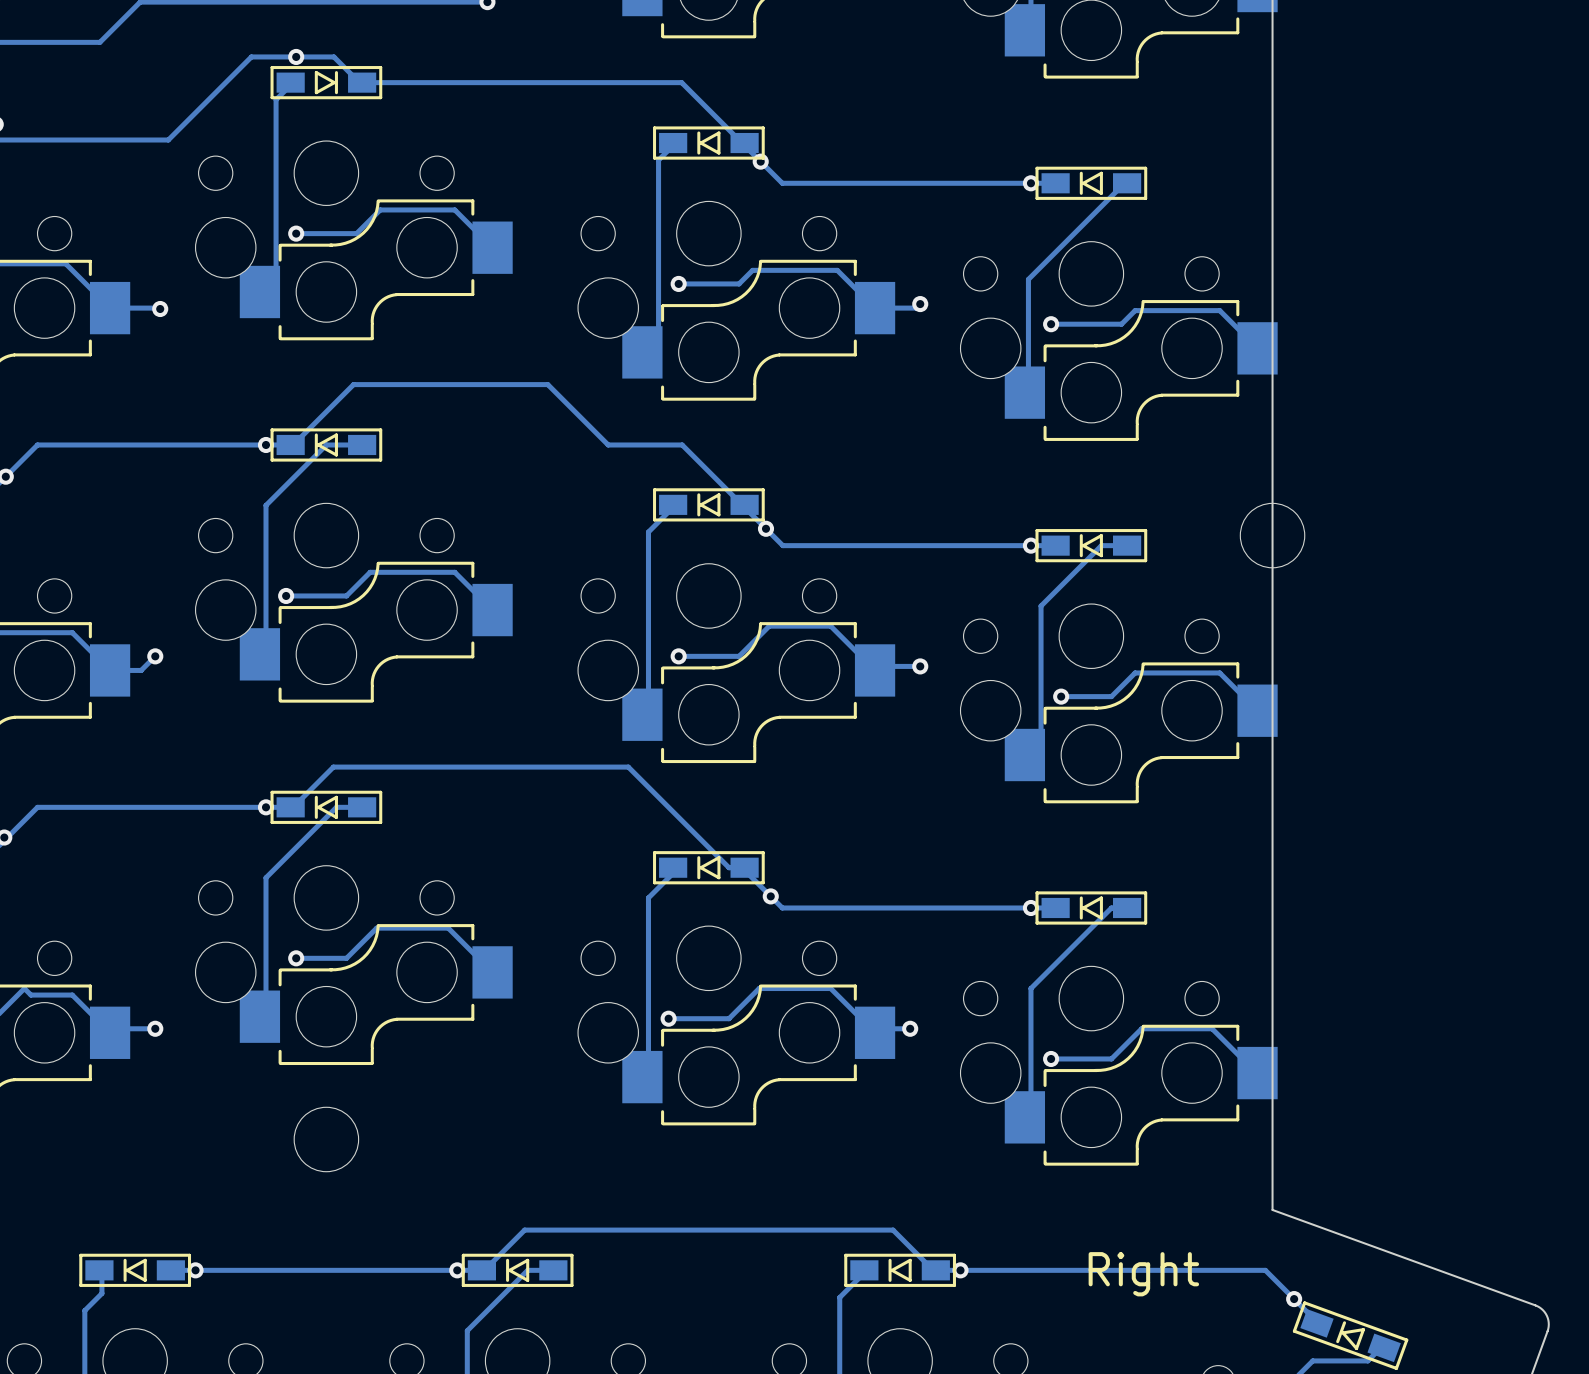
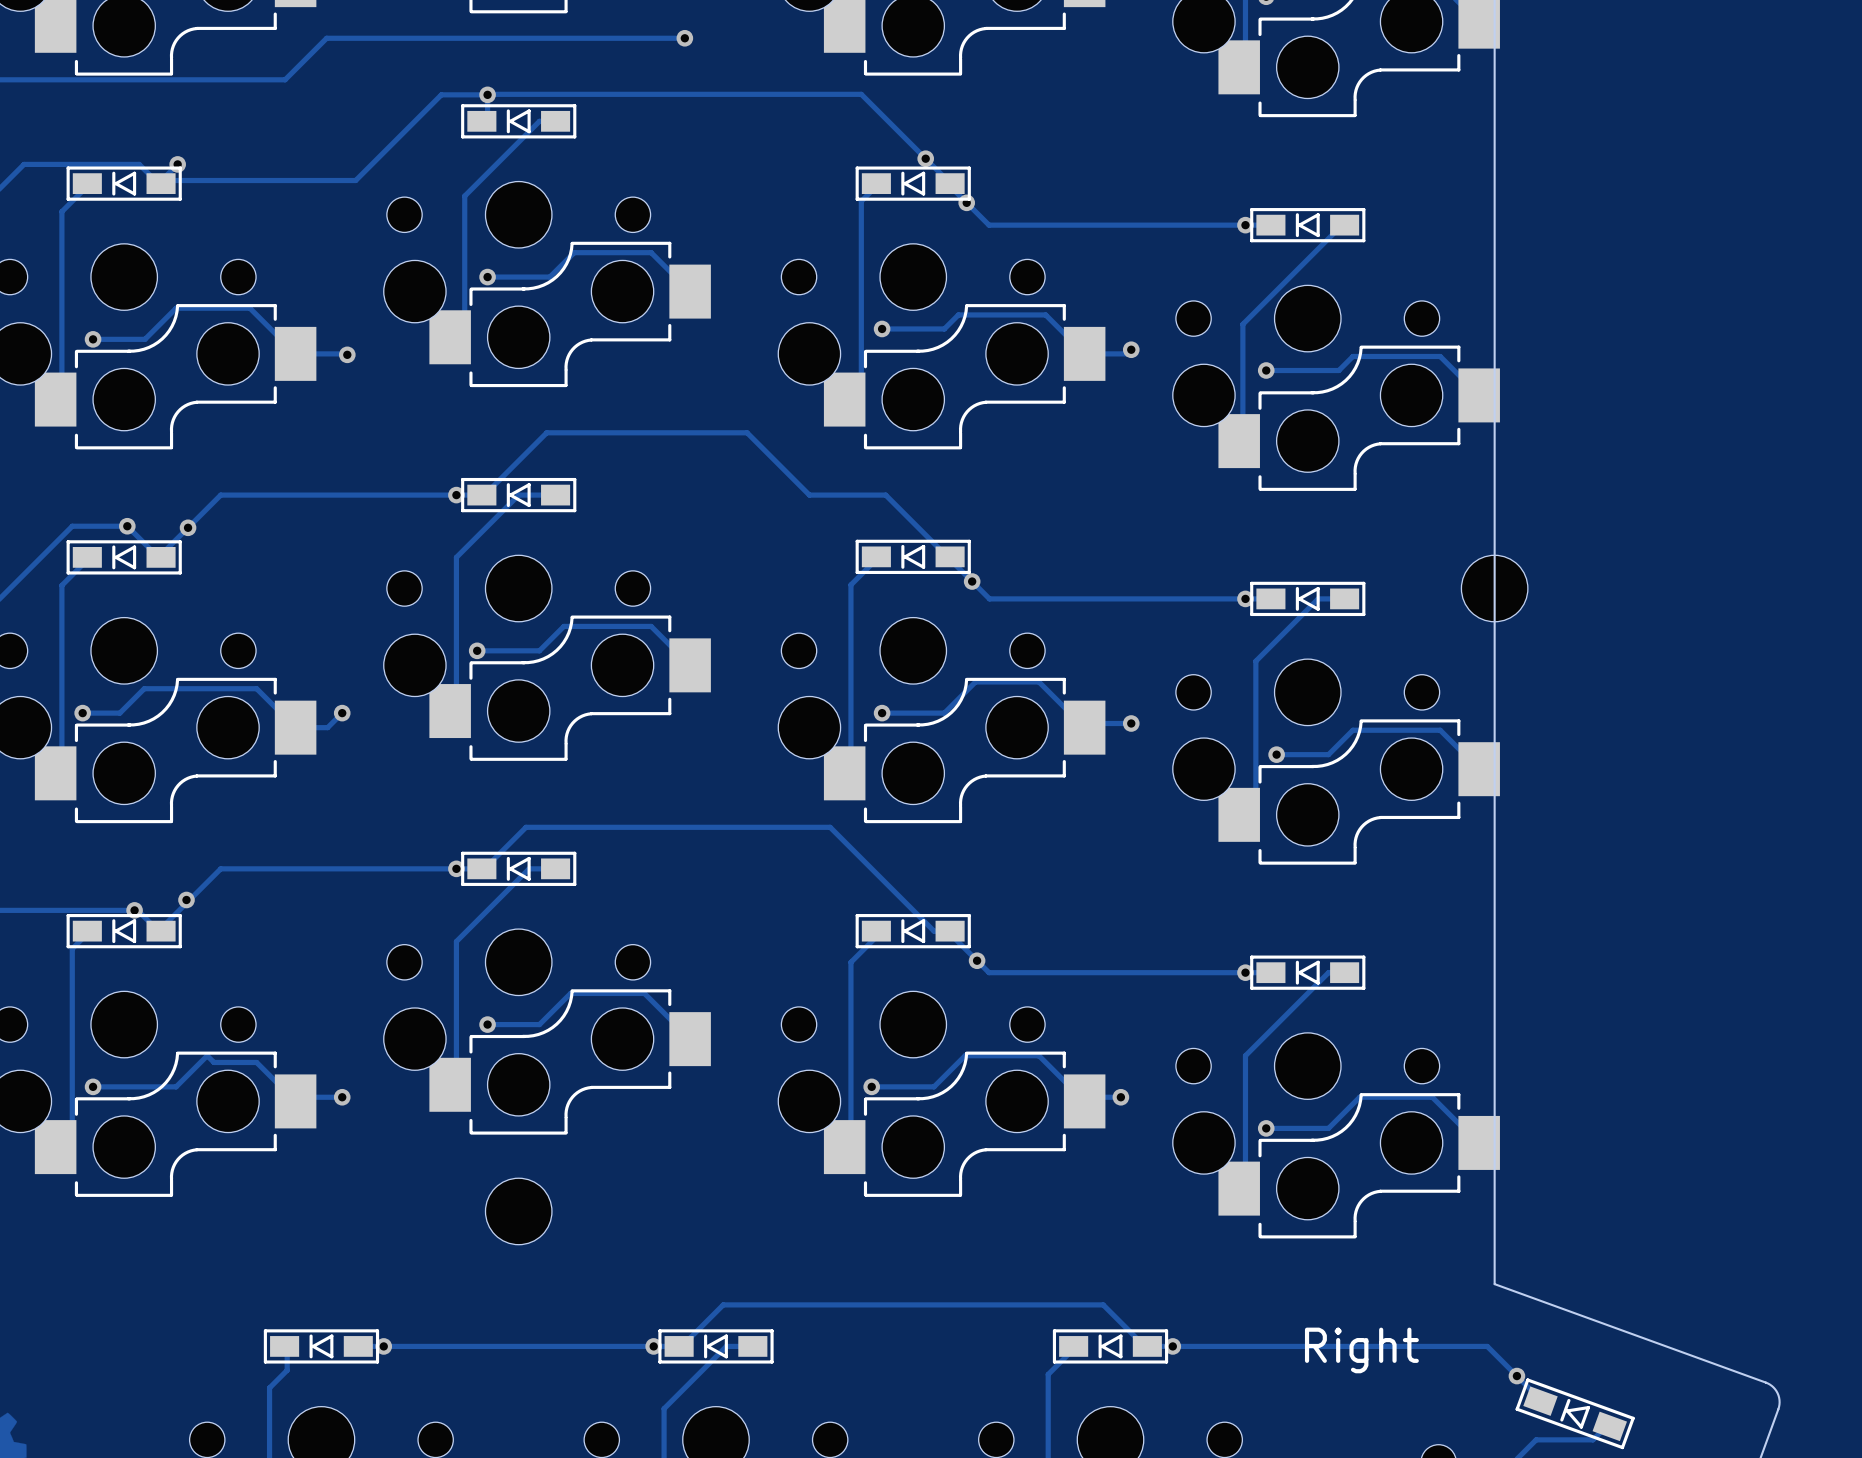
track: (296, 56) (333, 56) (359, 82) -> (450, 337) (464, 322) (464, 196) (539, 121) (552, 121)
track: none -> (481, 121) (487, 115) (488, 94) (861, 94) (950, 183)
track: (293, 82) (276, 99) (276, 275) -> none
part rotation: 0° (326, 82) -> 180° (518, 121)
track: (362, 82) (681, 82) (742, 143) -> none
via: none -> (925, 158)

